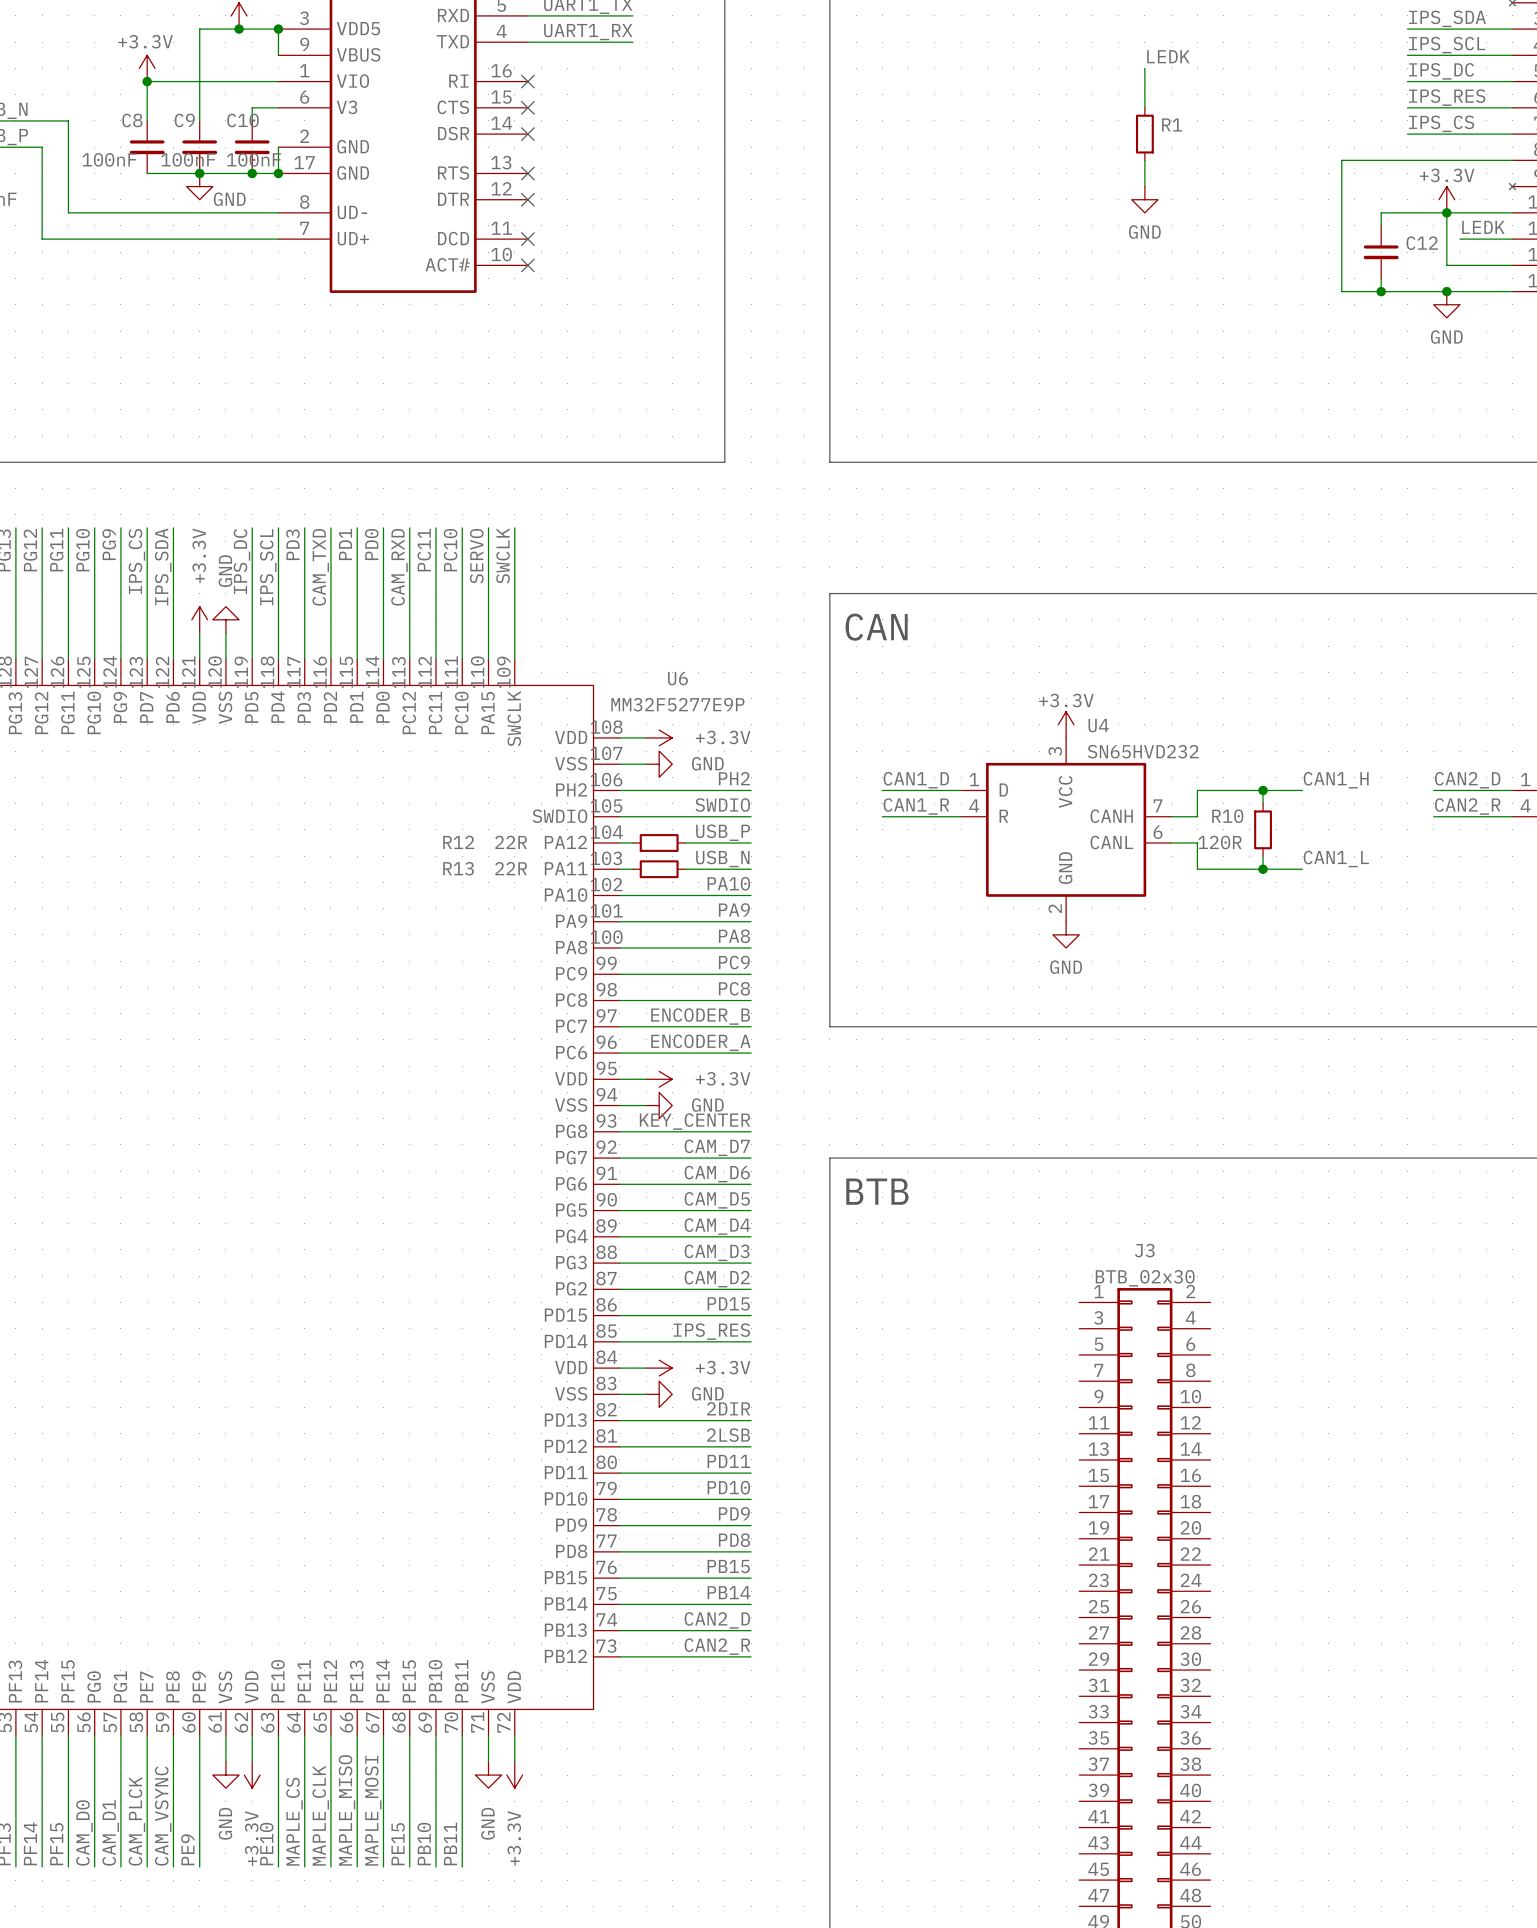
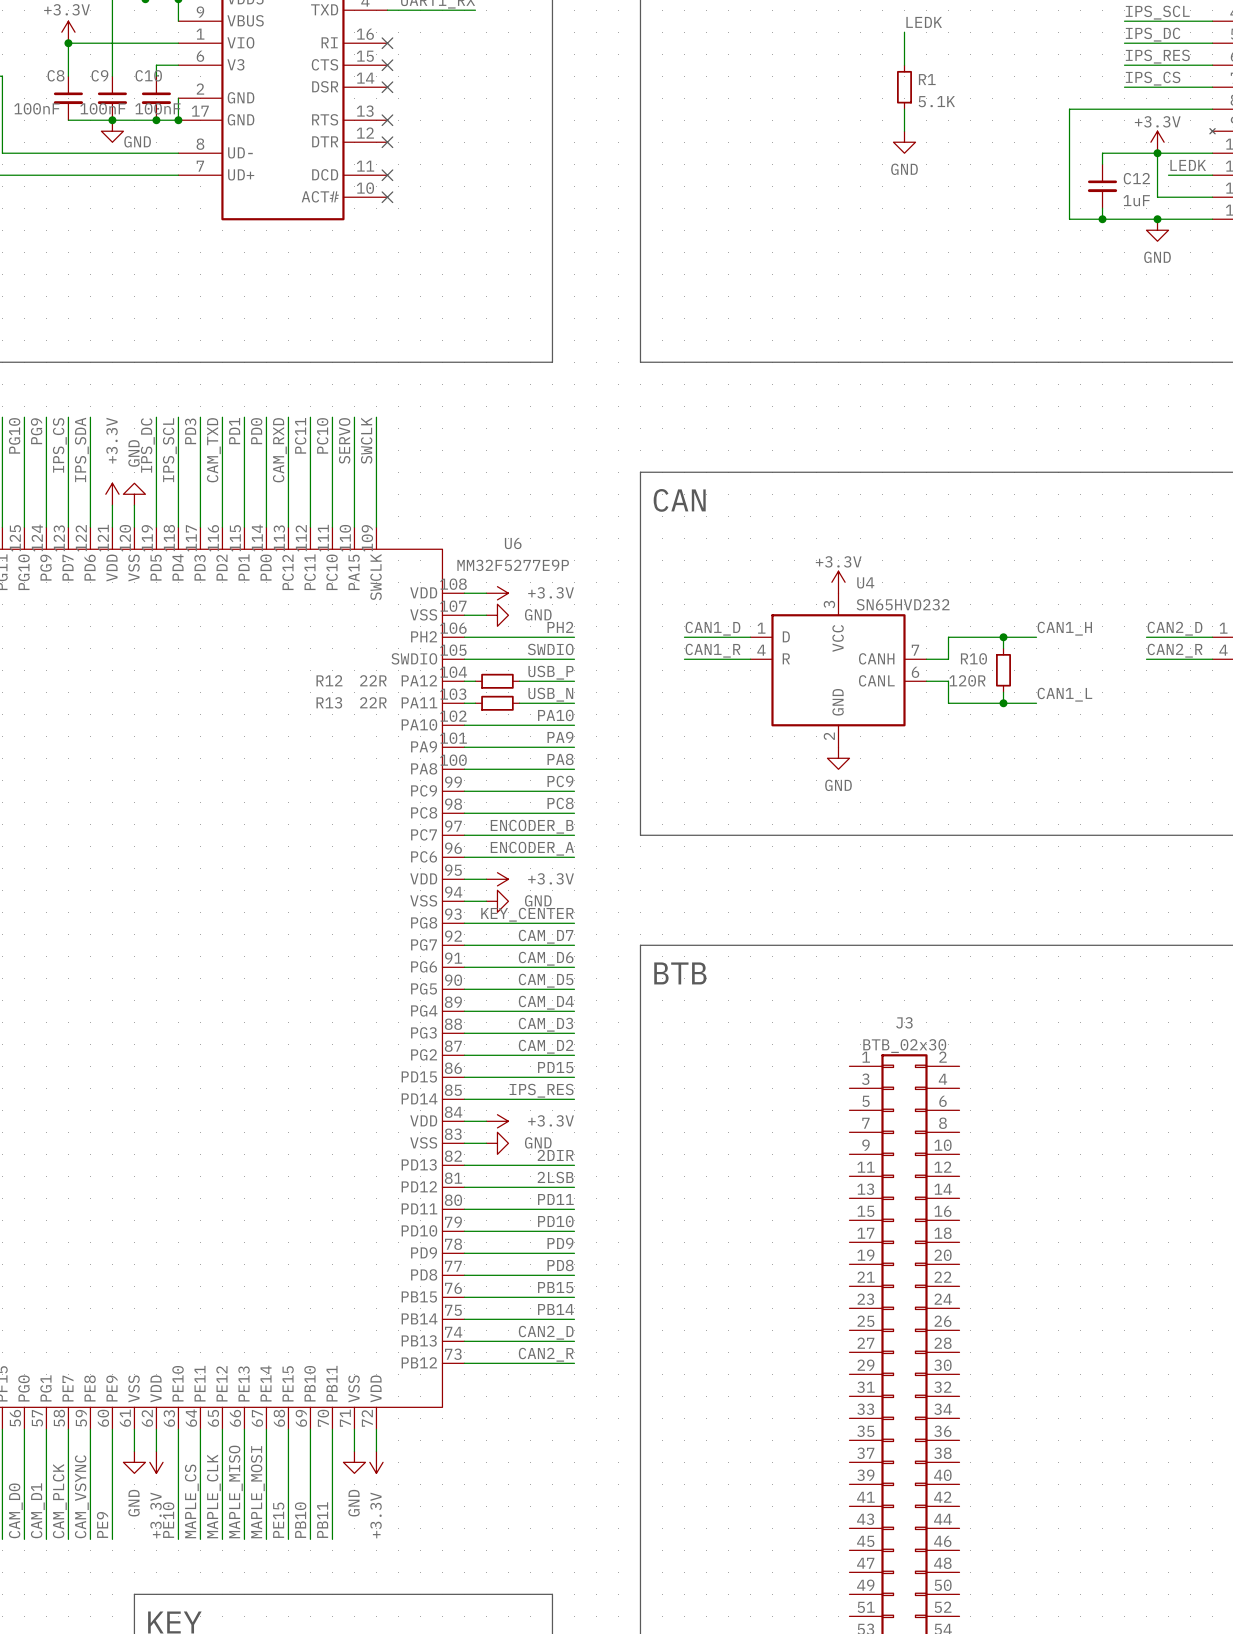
R1 value: none -> 5.1K (936, 101)
C12 value: none -> 1uF (1136, 200)

